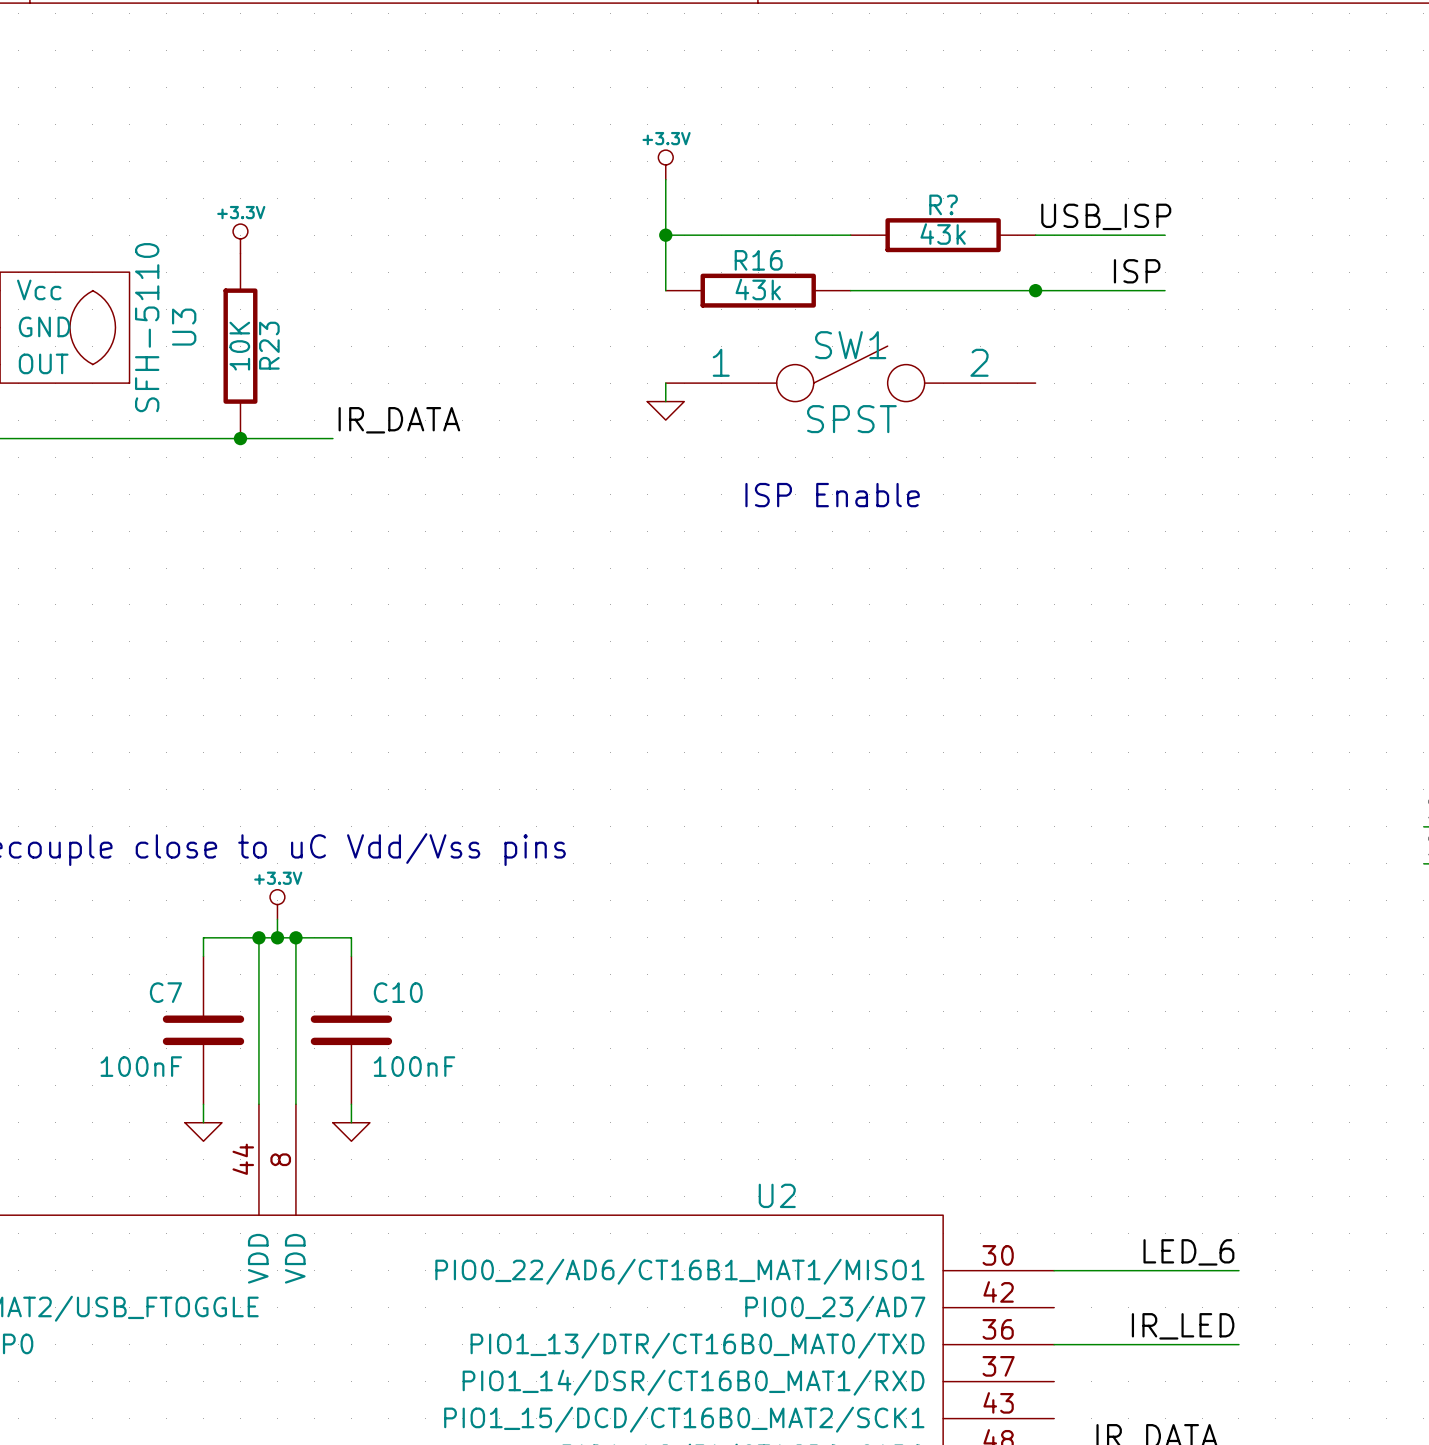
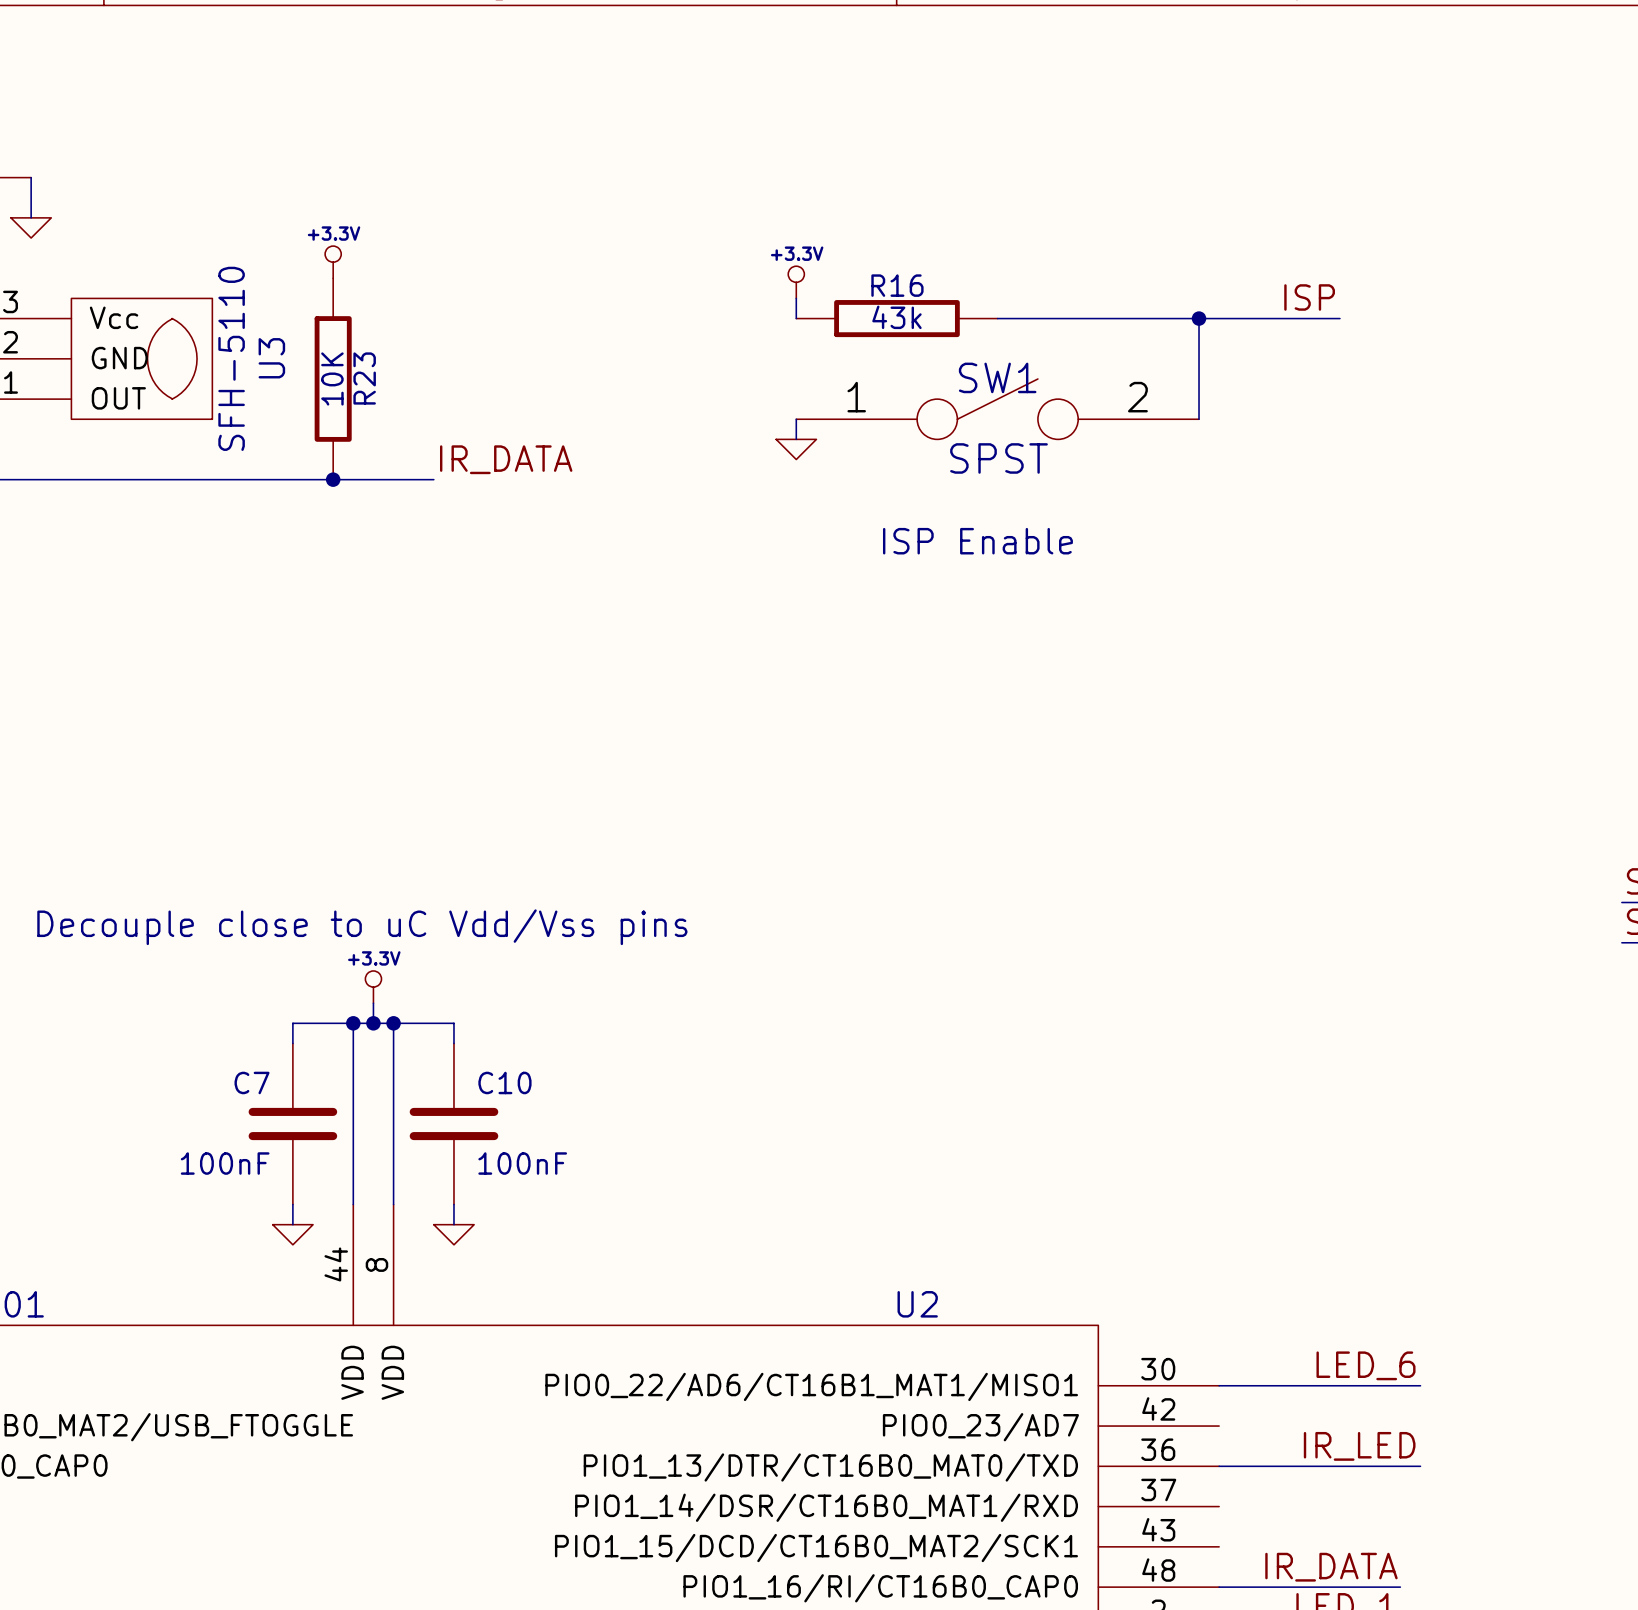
power symbol position: +3.3V (665, 164) -> +3.3V (796, 282)
wire: (665, 179) (665, 272) -> none
label: USB_ISP (1106, 216) -> none
wire: (665, 235) (850, 235) -> none
junction: (665, 235) -> none
R?: 43k (943, 235) -> none
wire: (1035, 235) (1165, 235) -> none
wire: none -> (1199, 318) (1199, 419)

